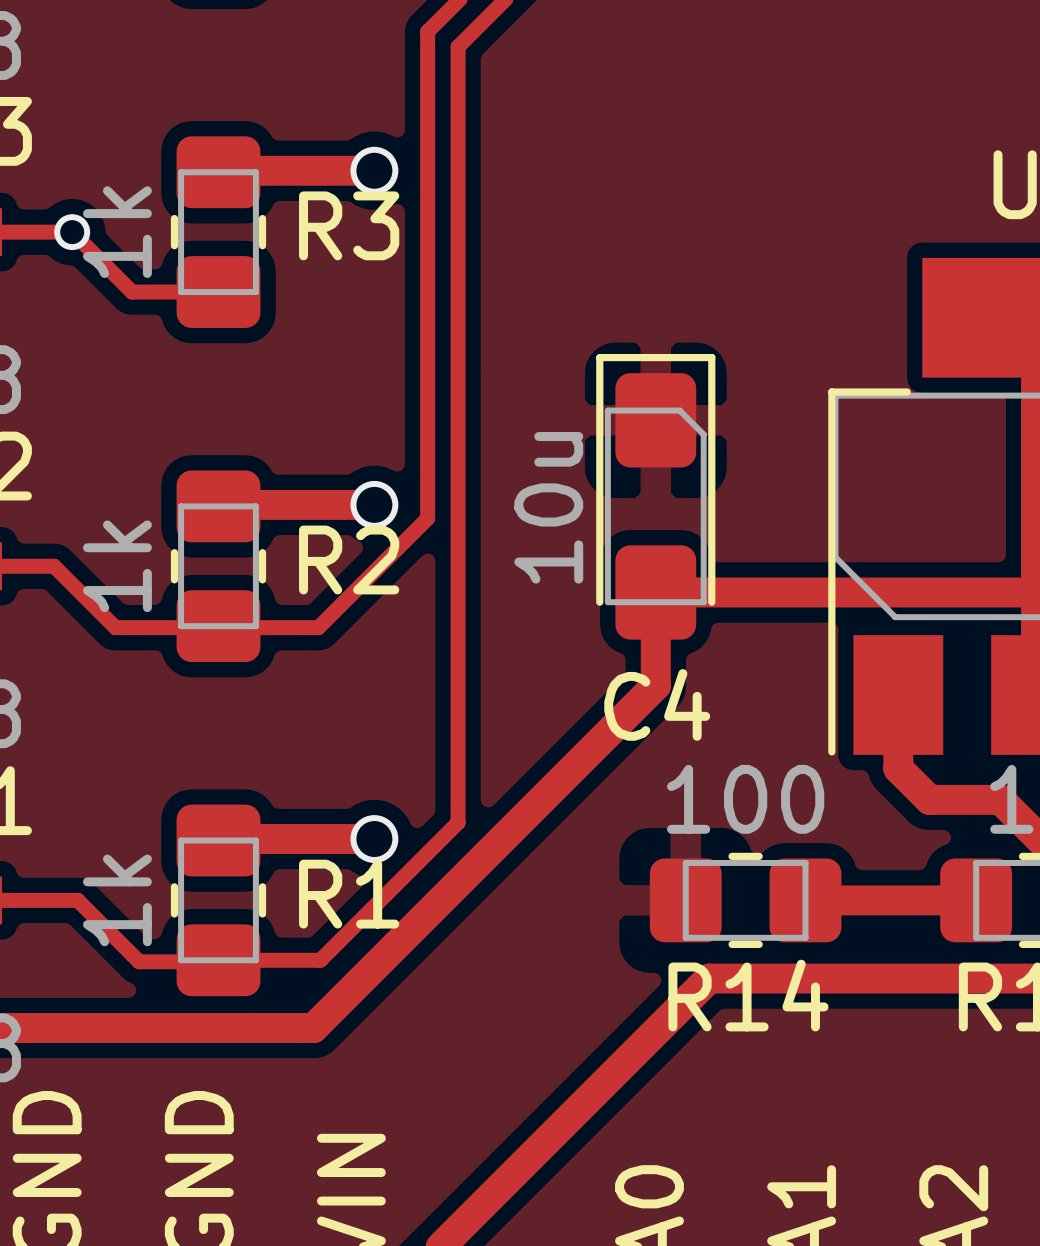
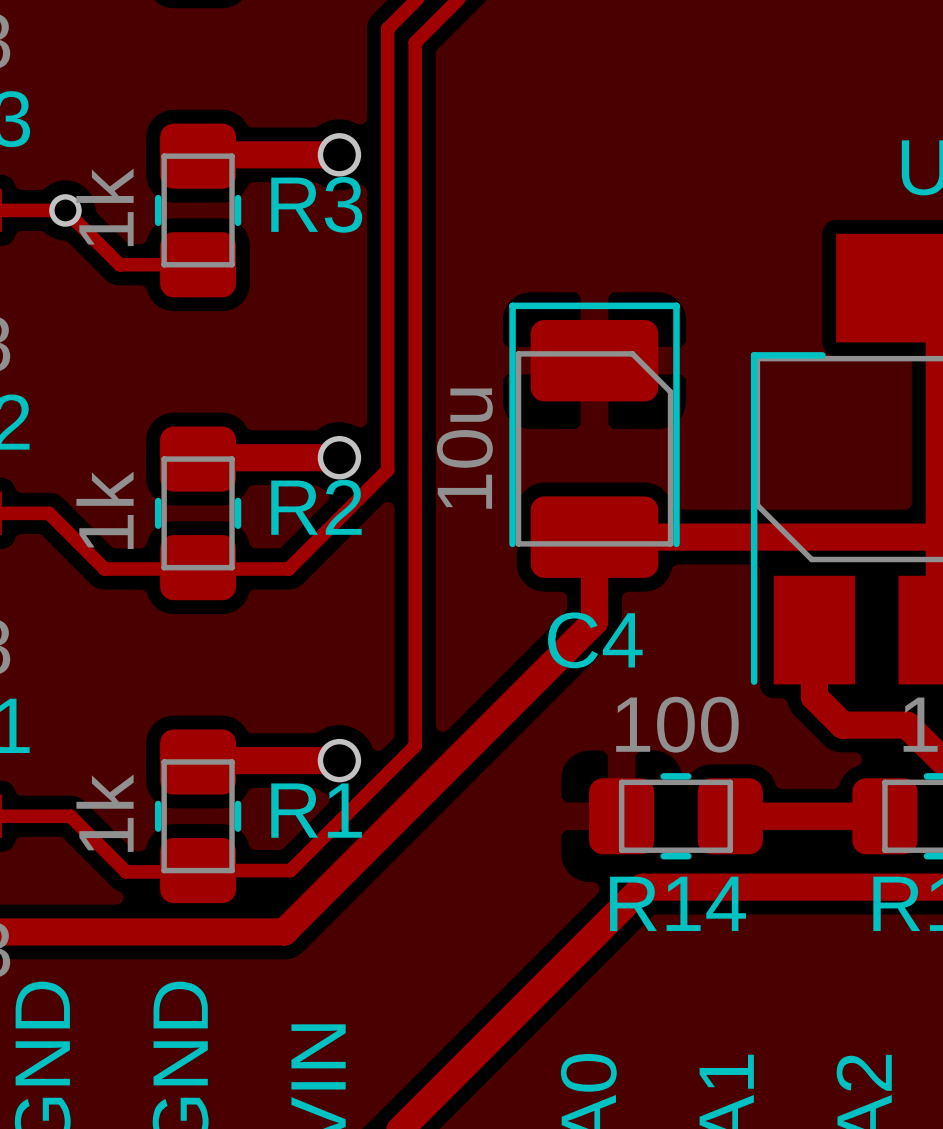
C4 footprint: [596, 353, 716, 640] -> [509, 302, 680, 578]
C4 value position: 10u (548, 507) -> 10u (464, 448)

